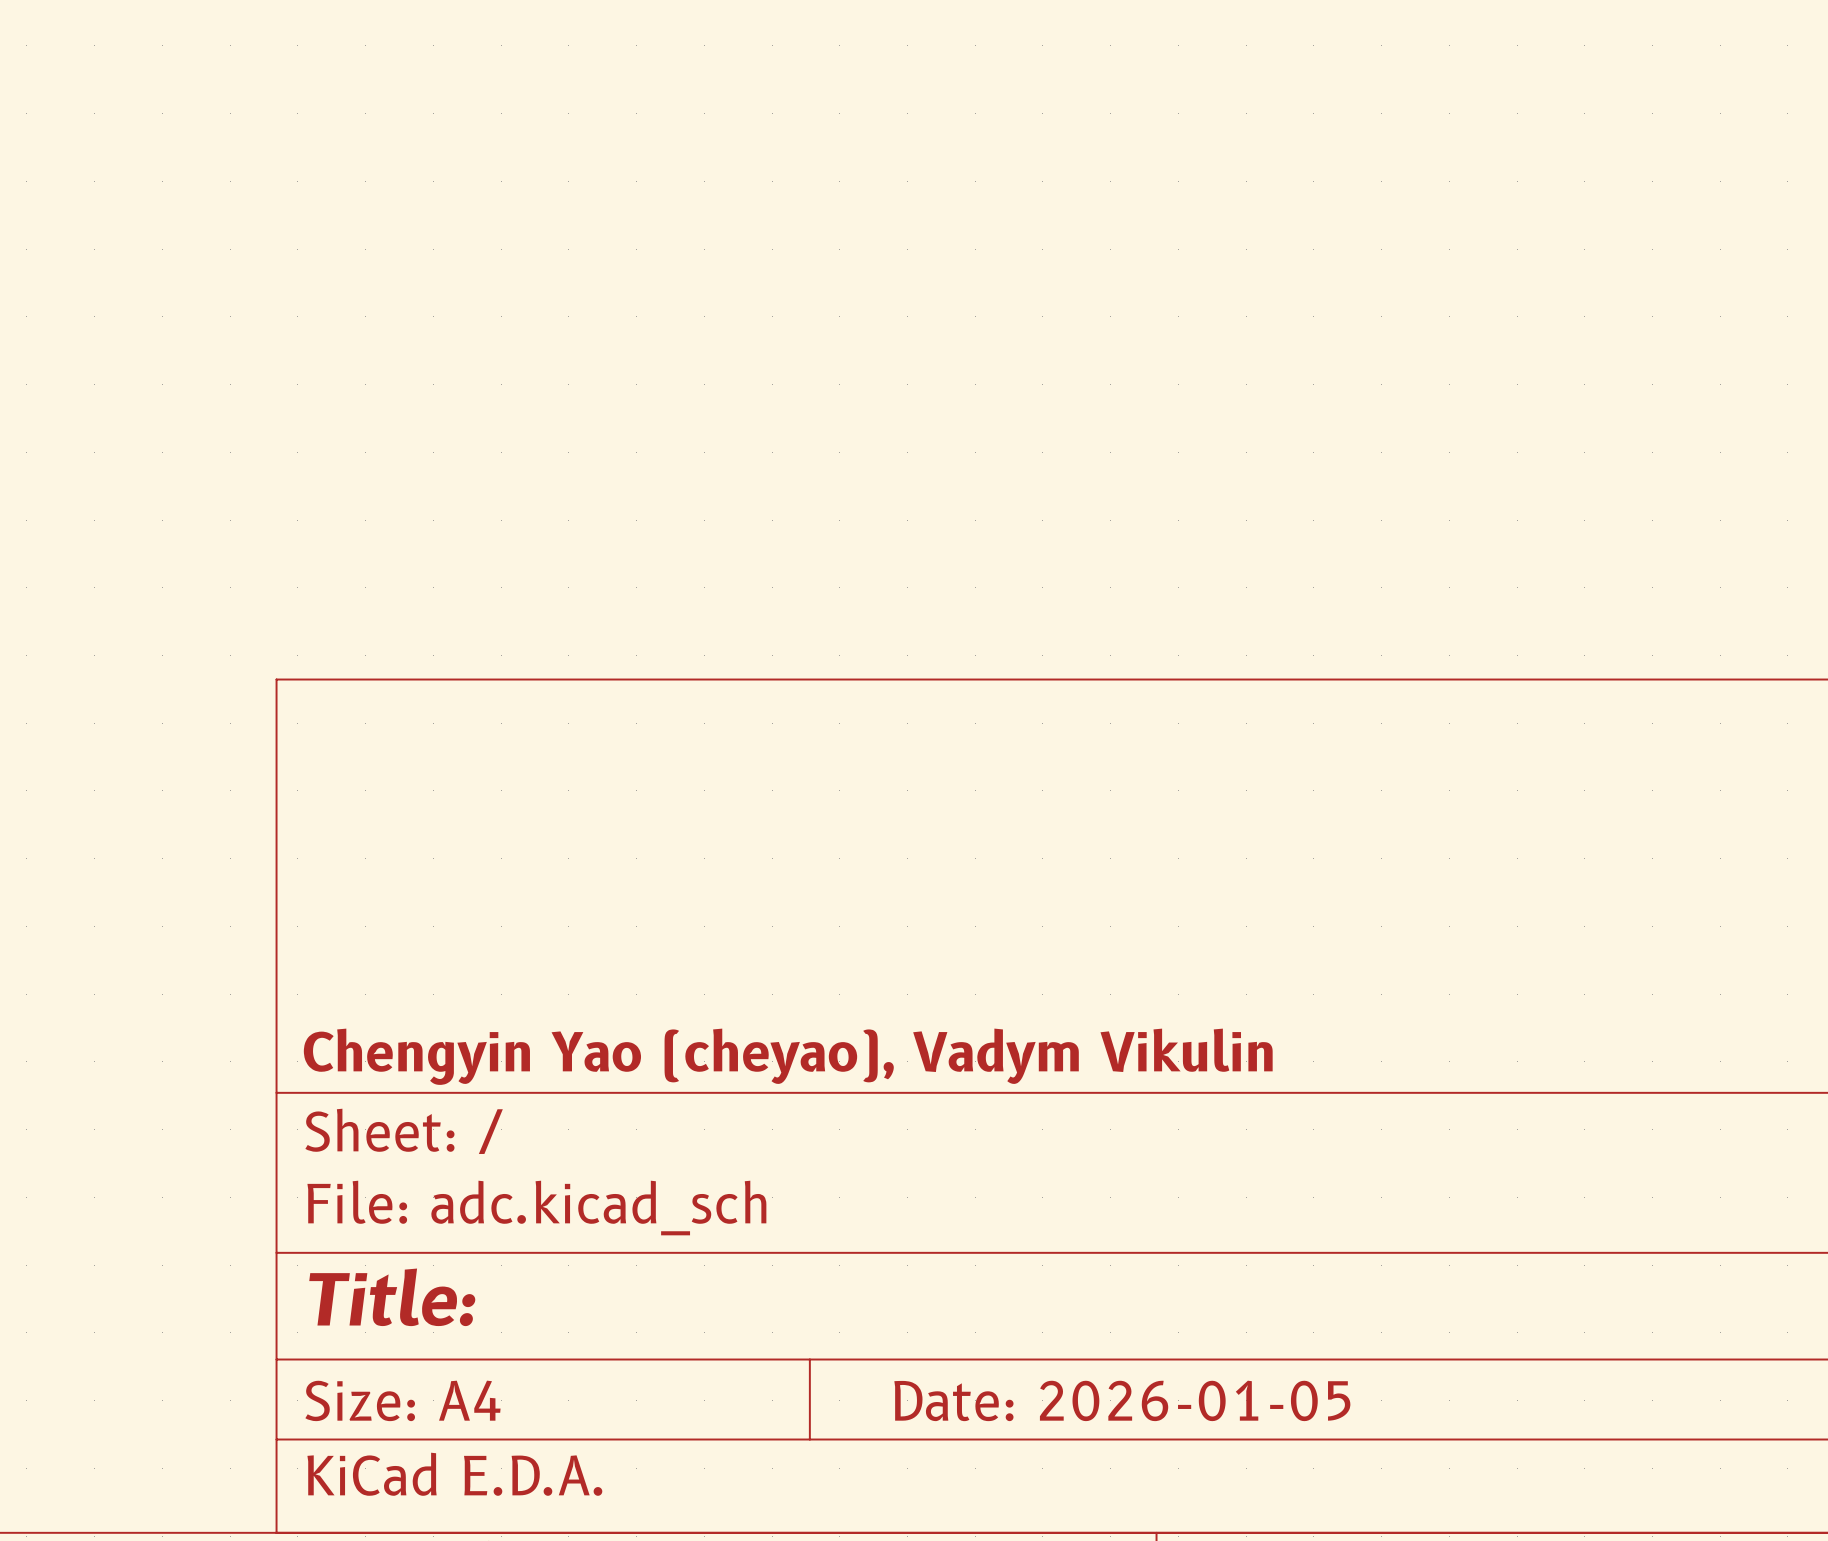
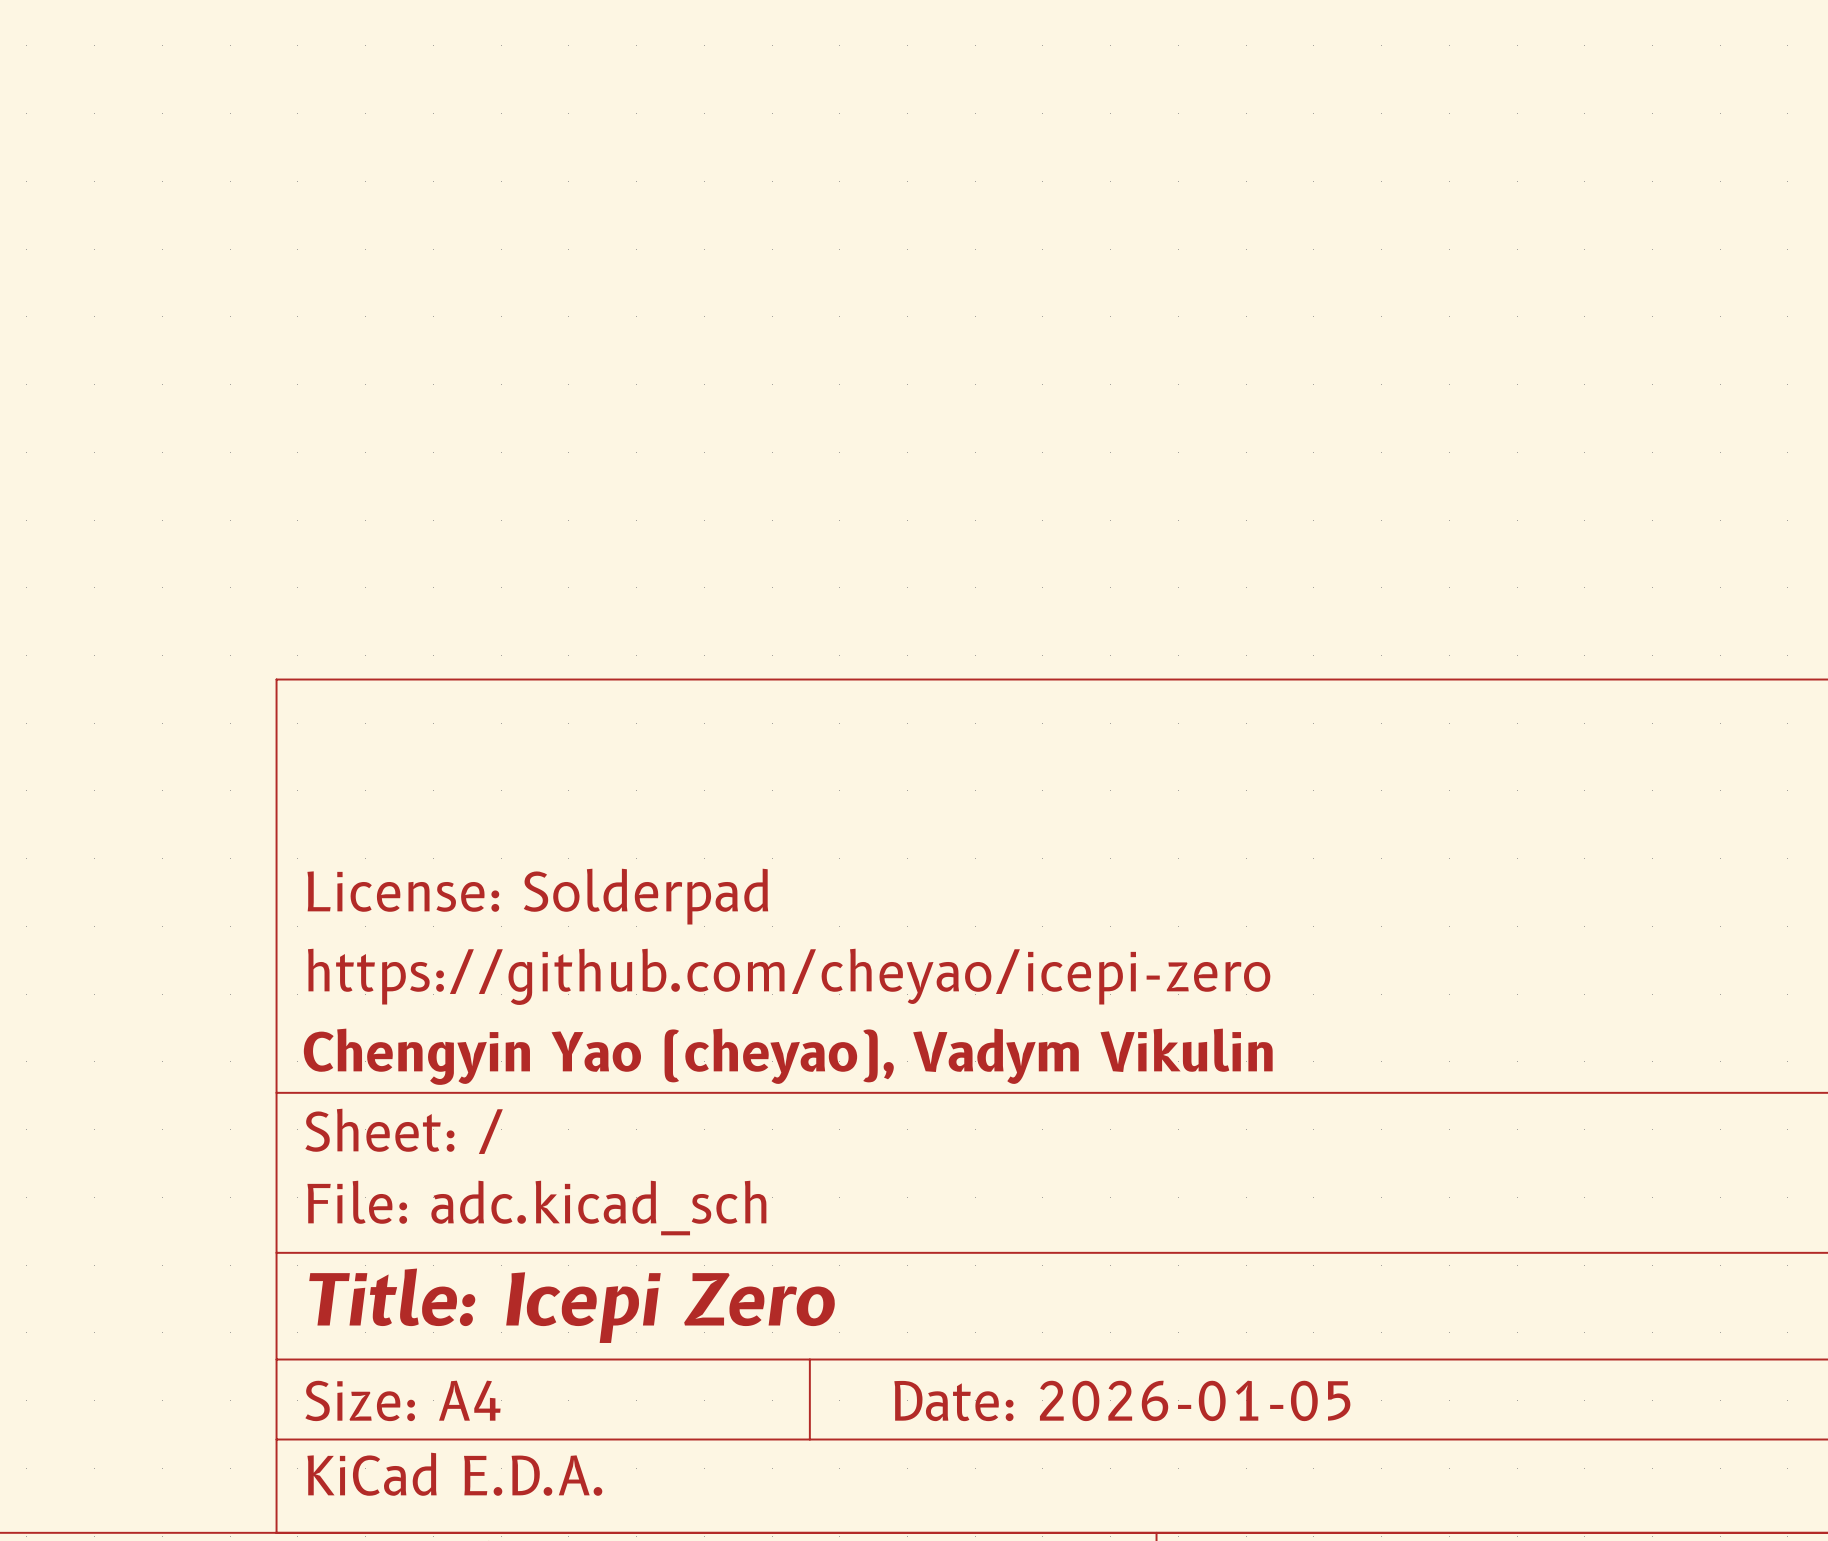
title block: none -> License: Solderpad (537, 896)
title block: none -> https://github.com/cheyao/icepi-zero (789, 976)
title block: Title: (392, 1297) -> Title: Icepi Zero (572, 1305)

